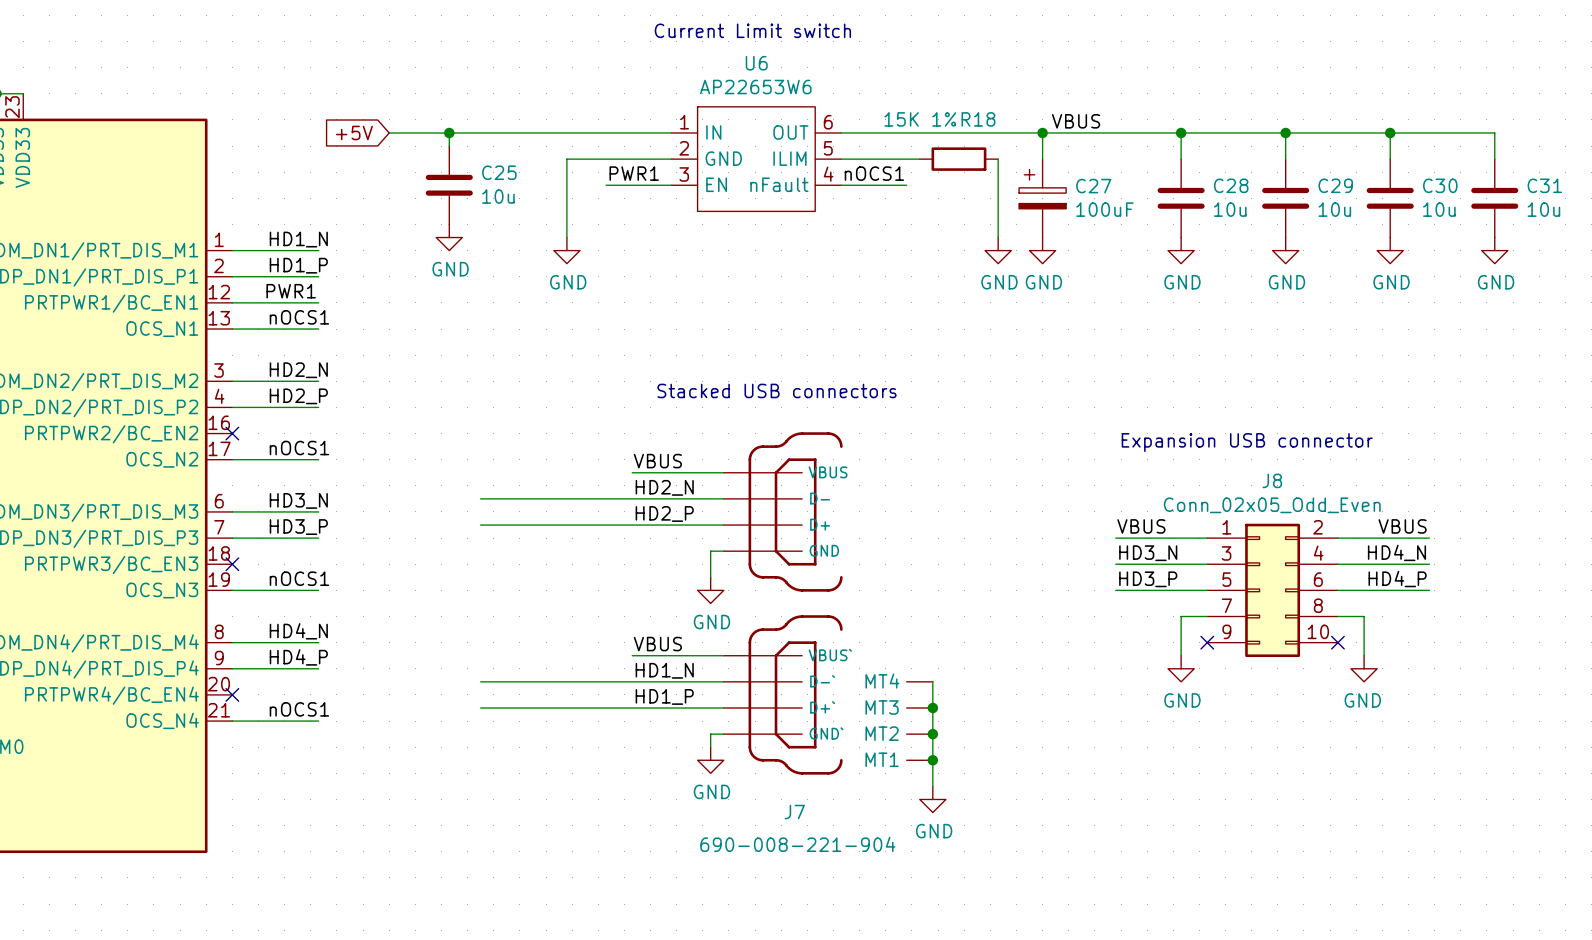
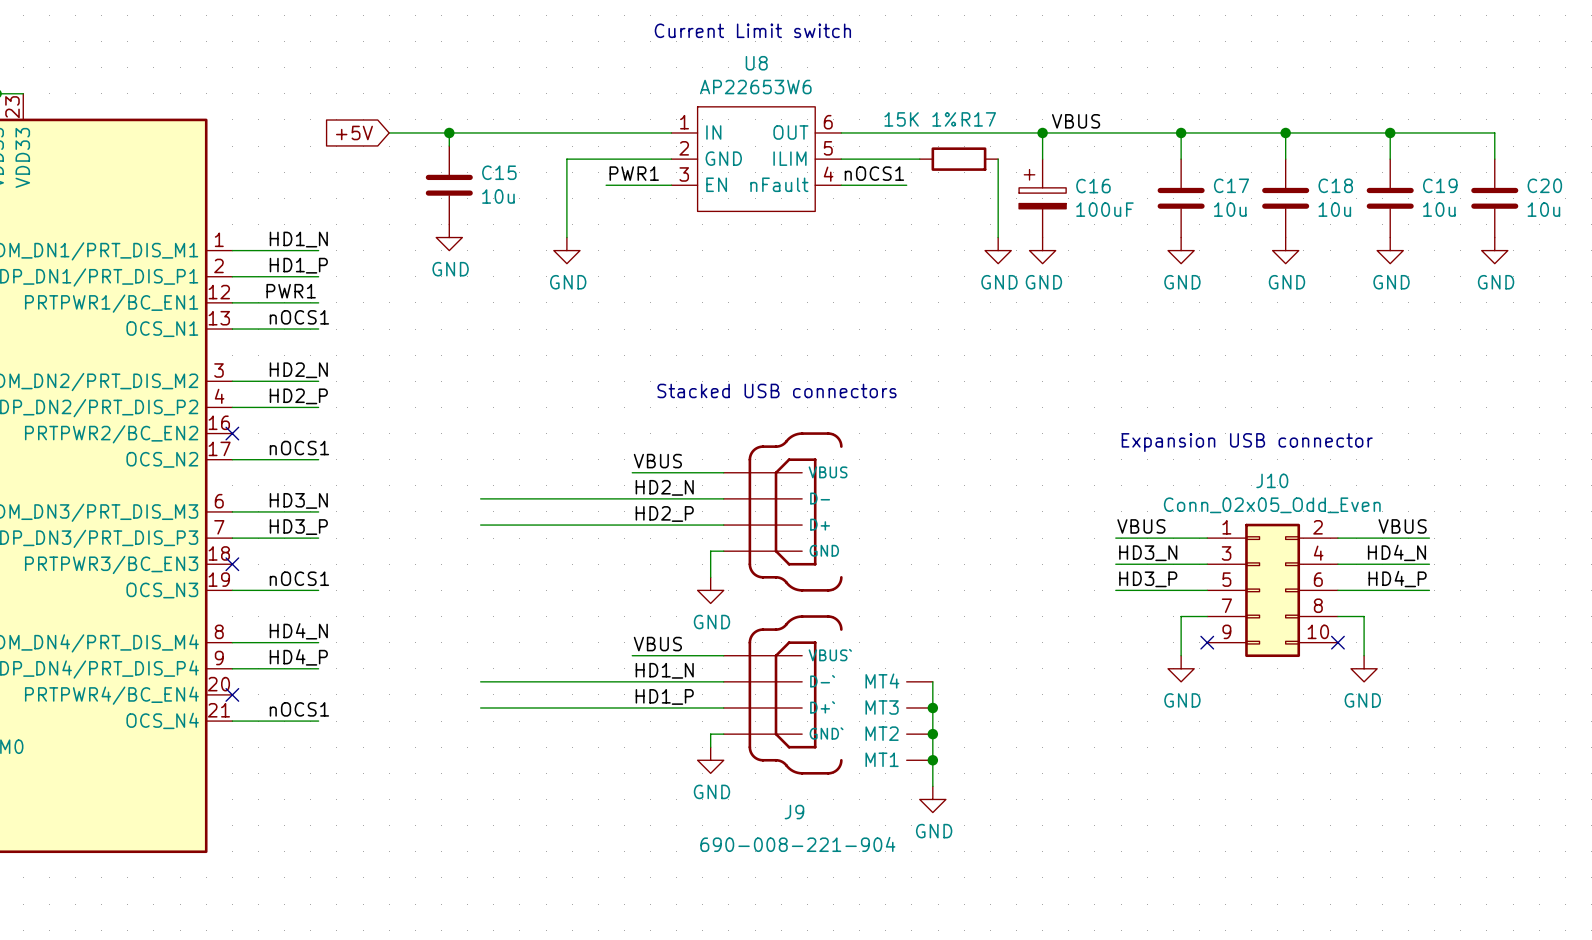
U6 name: U6 (756, 63) -> U8 (756, 63)
R18 name: R18 (978, 119) -> R17 (978, 119)
C25 name: C25 (499, 172) -> C15 (499, 172)
C28 name: C28 (1231, 185) -> C17 (1231, 185)
C29 name: C29 (1335, 185) -> C18 (1335, 185)
C30 name: C30 (1440, 185) -> C19 (1440, 185)
C31 name: C31 (1544, 185) -> C20 (1544, 185)
C27 name: C27 (1093, 186) -> C16 (1093, 186)
J8 name: J8 (1272, 480) -> J10 (1272, 480)
J7 name: J7 (794, 812) -> J9 (794, 812)

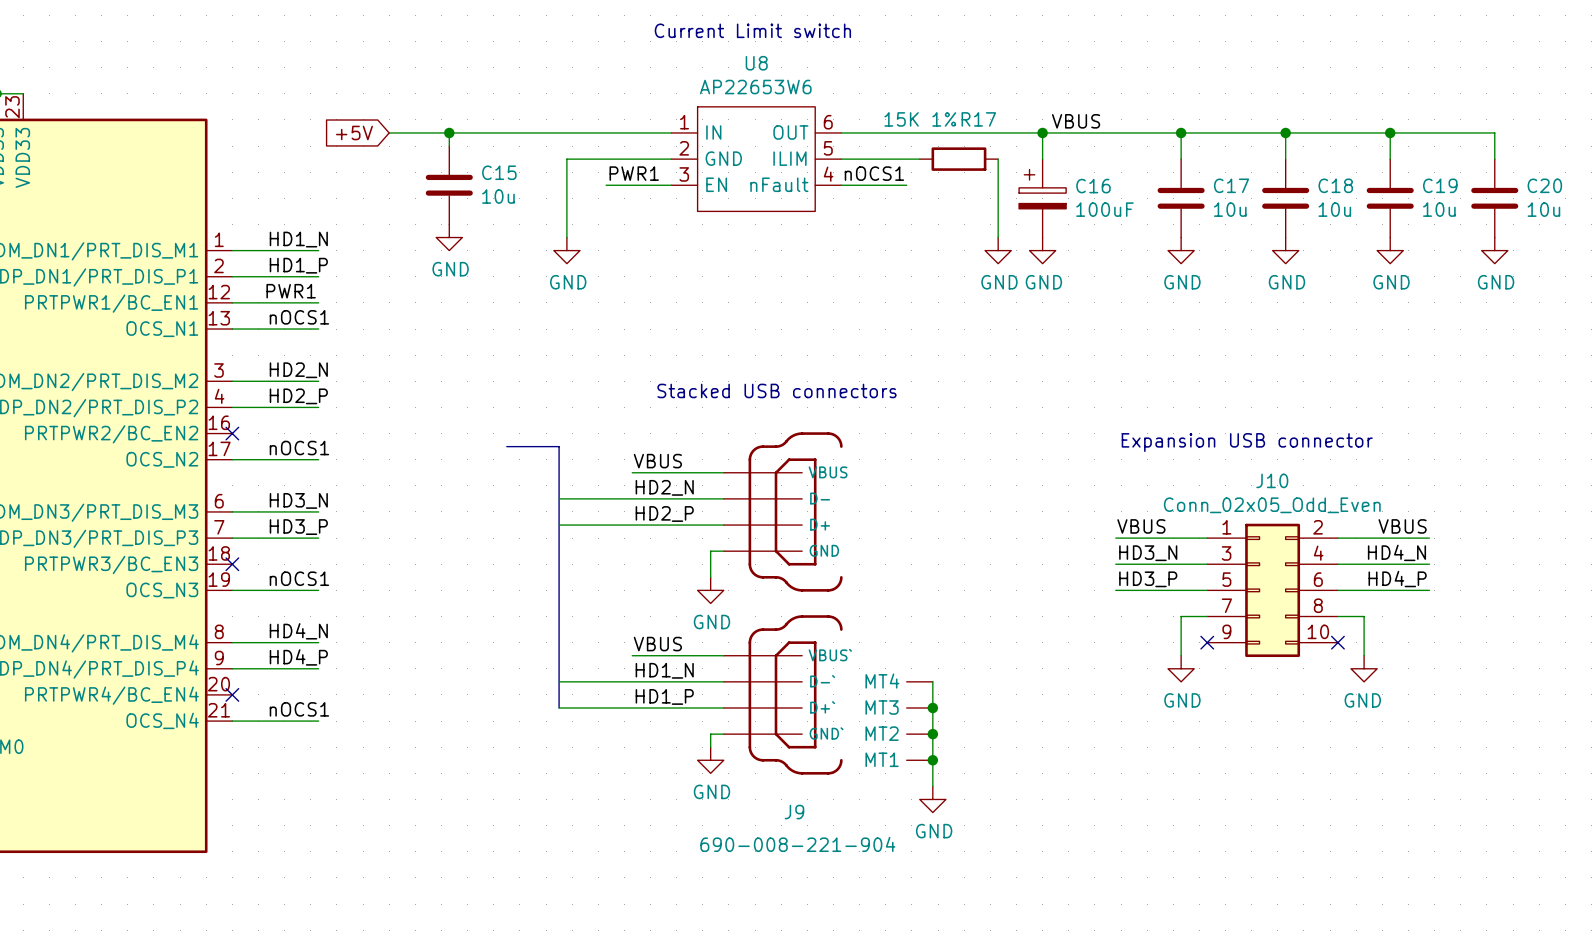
bus: none -> (506, 446) (559, 446) (559, 707)
wire: (480, 498) (559, 498) -> none
wire: (480, 525) (559, 525) -> none
wire: (480, 681) (559, 681) -> none
wire: (480, 707) (559, 707) -> none

